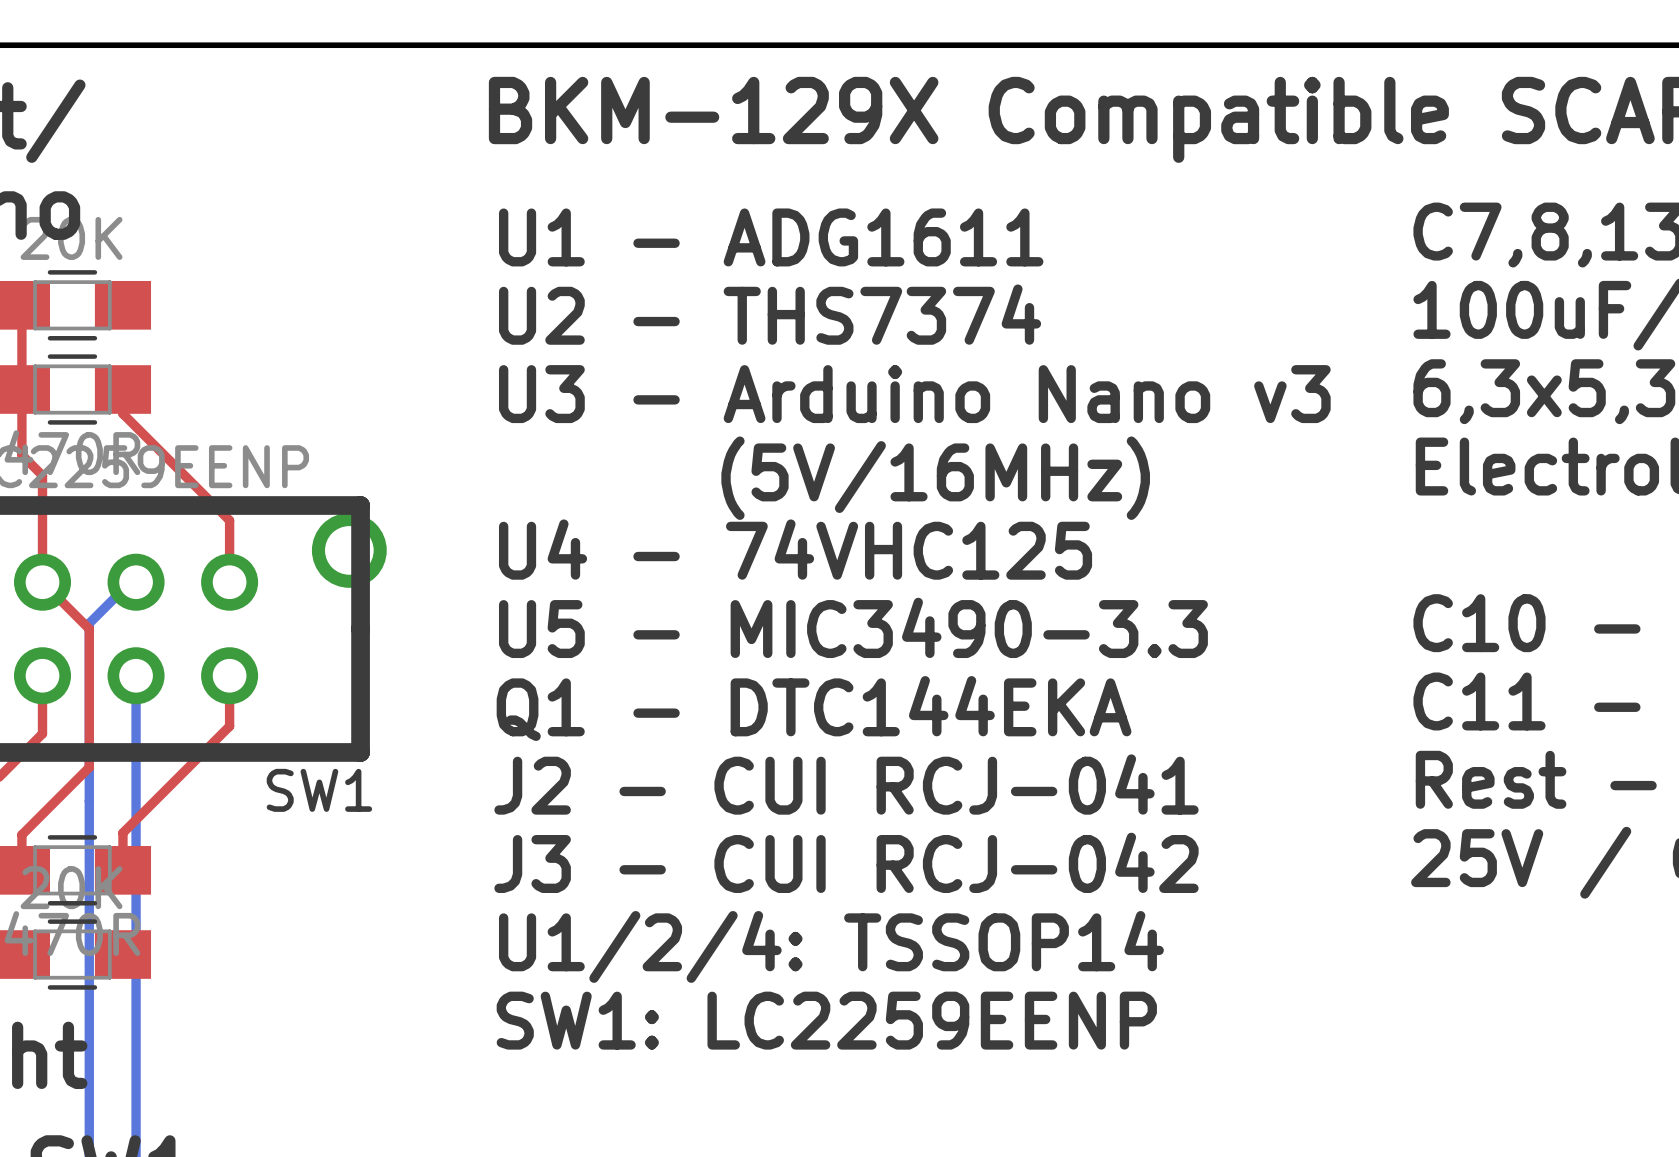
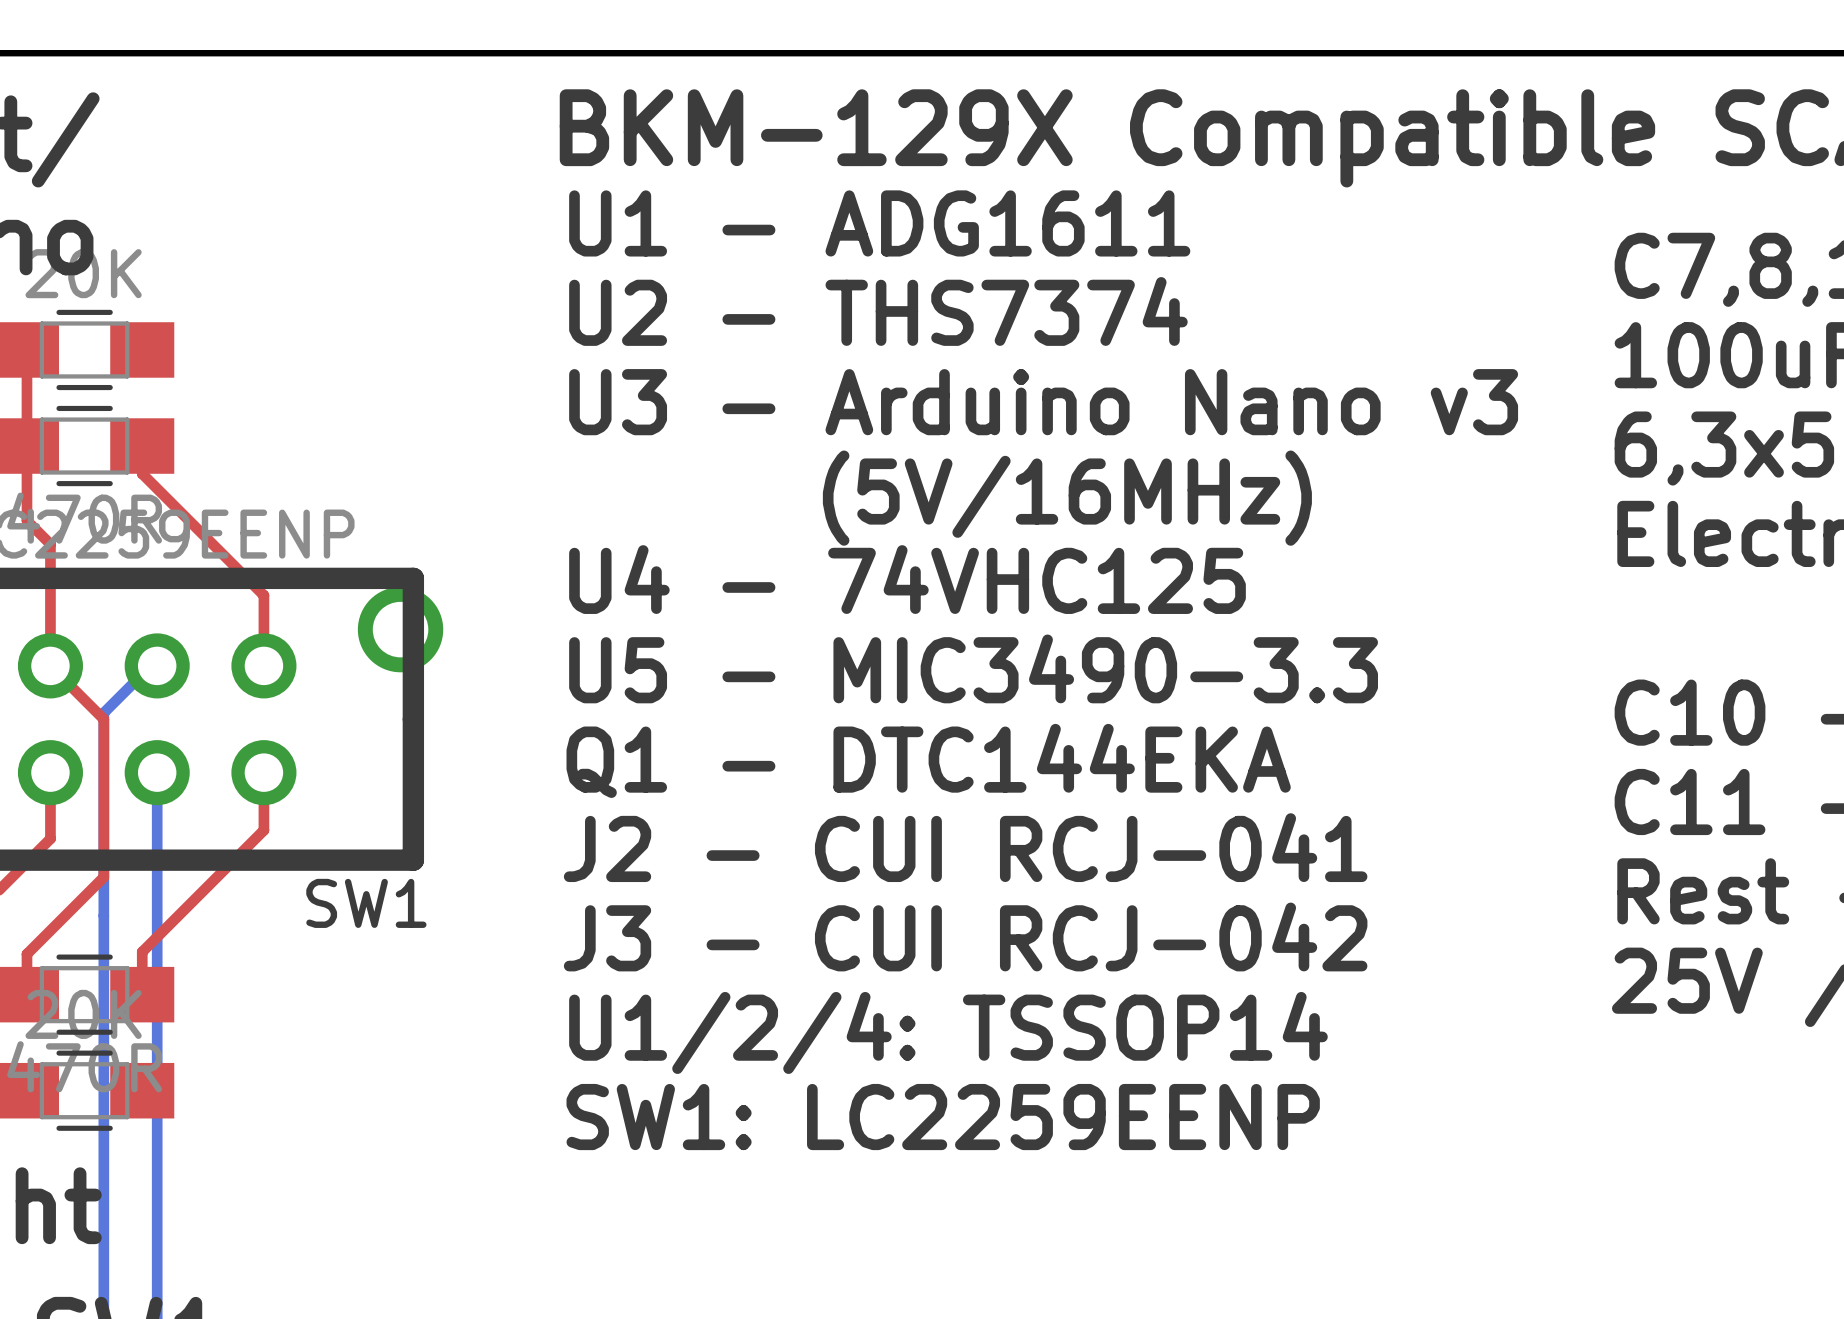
text position: U1 - ADG1611 (771, 237) -> U1 - ADG1611 (879, 223)
text position: U2 - THS7374 (770, 314) -> U2 - THS7374 (878, 311)
text position: U3 - Arduino Nano v3 (914, 394) -> U3 - Arduino Nano v3 (1043, 402)
text position: (5V/16MHz) (935, 478) -> (5V/16MHz) (1067, 498)
text position: U4 - 74VHC125 (795, 549) -> U4 - 74VHC125 (907, 579)
text position: U5 - MIC3490-3.3 (853, 627) -> U5 - MIC3490-3.3 (973, 668)
text position: Q1 - DTC144EKA (814, 708) -> Q1 - DTC144EKA (928, 760)
text position: J2 - CUI RCJ-041 (846, 784) -> J2 - CUI RCJ-041 (965, 847)
text position: J3 - CUI RCJ-042 (846, 862) -> J3 - CUI RCJ-042 (965, 936)
text position: U1/2/4: TSSOP14 (831, 946) -> U1/2/4: TSSOP14 (948, 1032)
text position: SW1: LC2259EENP (826, 1020) -> SW1: LC2259EENP (943, 1117)

